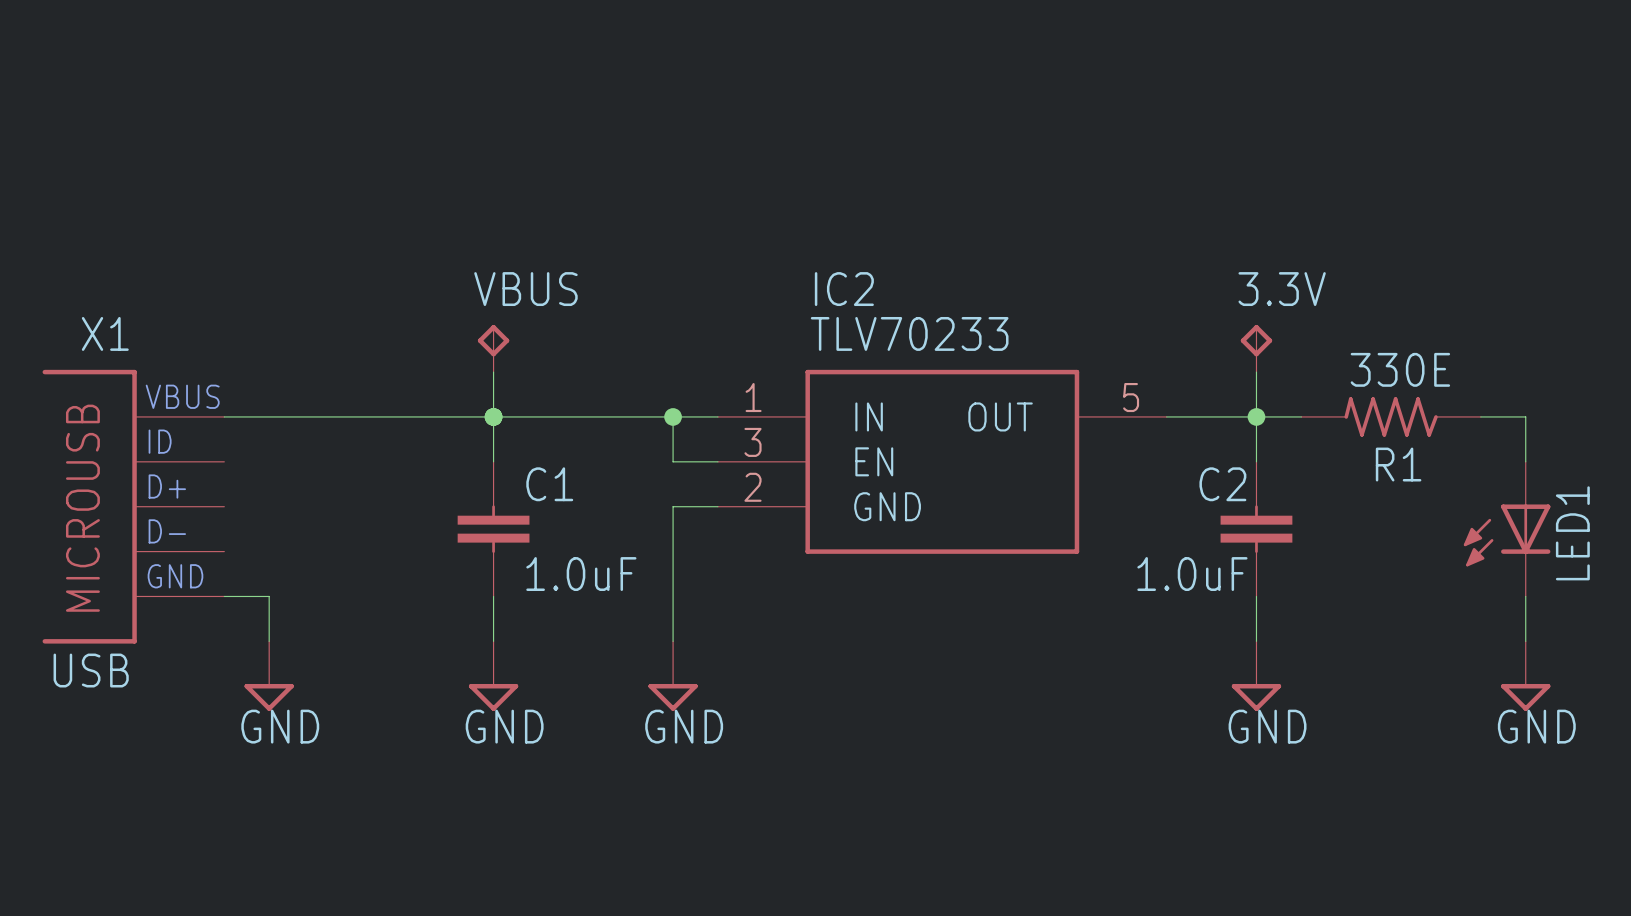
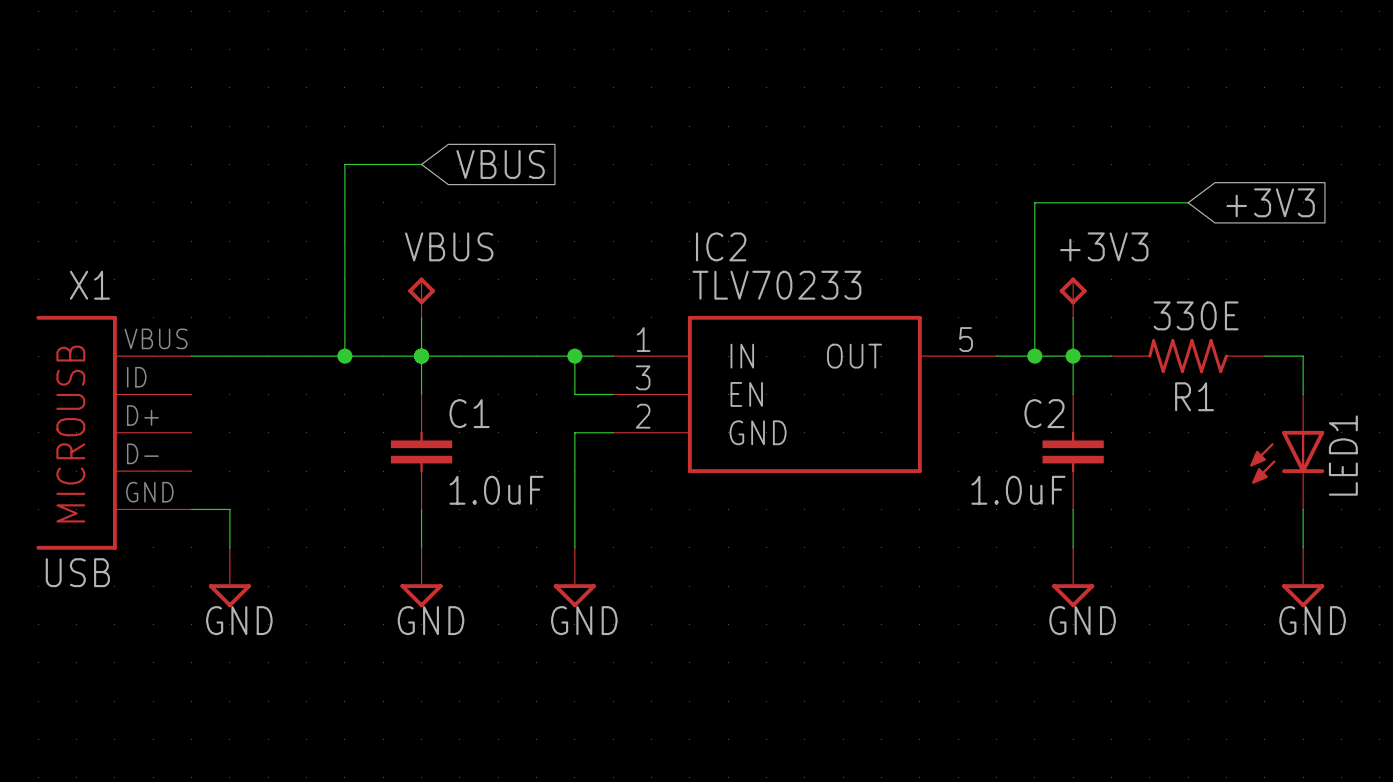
wire: none -> (421, 164) (344, 164) (344, 356)
global label: none -> VBUS (500, 164)
wire: none -> (1188, 202) (1034, 202) (1034, 356)
global label: none -> +3V3 (1270, 202)
3.3V name: 3.3V (1282, 289) -> +3V3 (1104, 246)
junction: none -> (344, 356)
junction: none -> (1034, 356)

